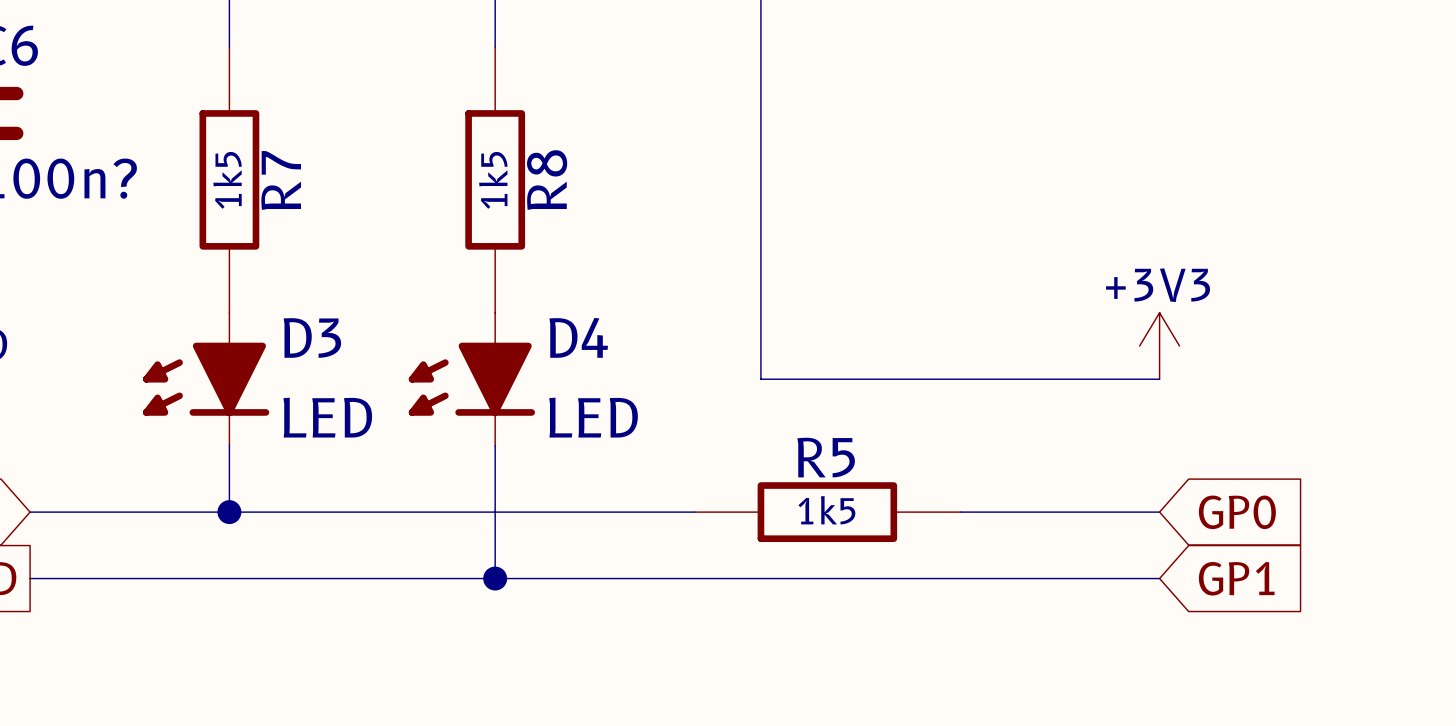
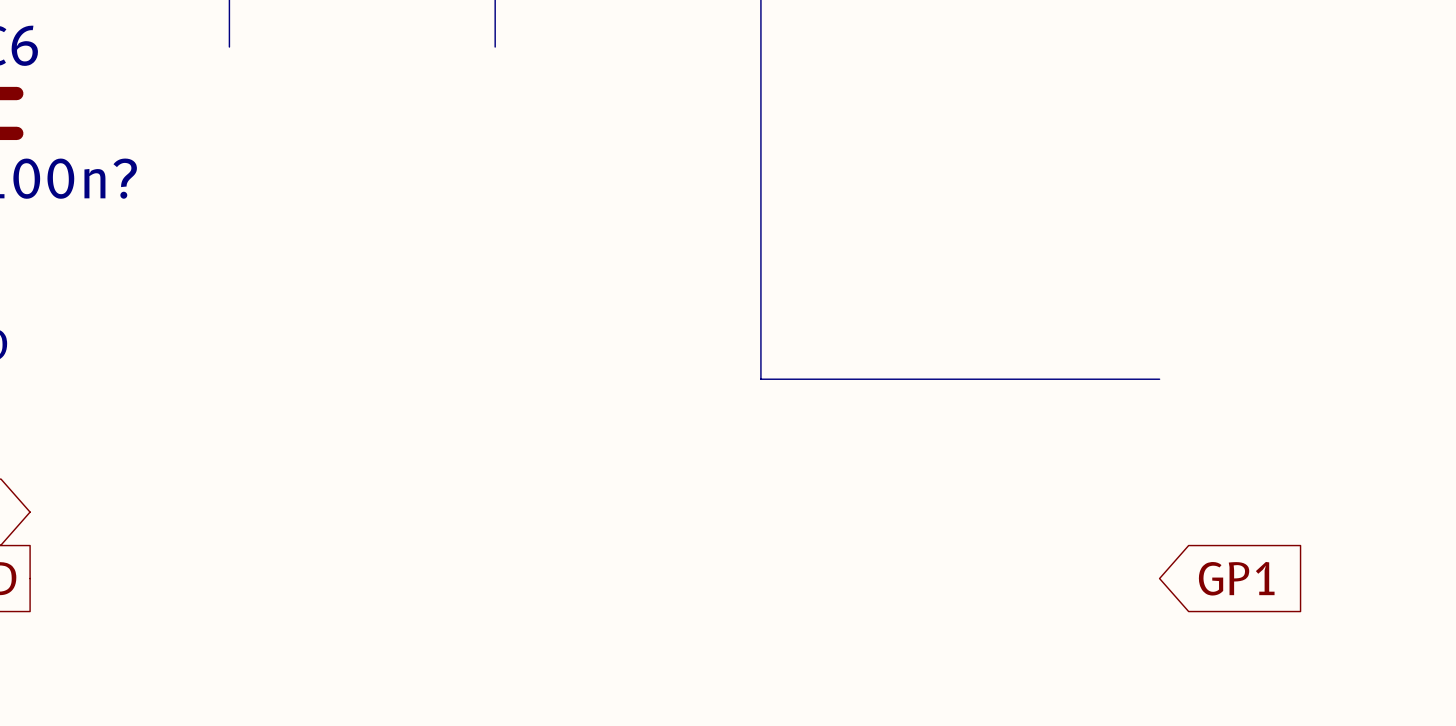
R7: 1k5 (229, 179) -> none
R8: 1k5 (495, 179) -> none
power symbol: +3V3 (1159, 346) -> none
D3: LED (206, 379) -> none
D4: LED (471, 379) -> none
wire: (229, 445) (229, 512) -> none
wire: (495, 445) (495, 578) -> none
wire: (30, 512) (694, 512) -> none
junction: (229, 512) -> none
R5: 1k5 (827, 512) -> none
wire: (960, 512) (1159, 512) -> none
global label: GP0 (1237, 512) -> none
wire: (30, 578) (1159, 578) -> none
junction: (495, 578) -> none

